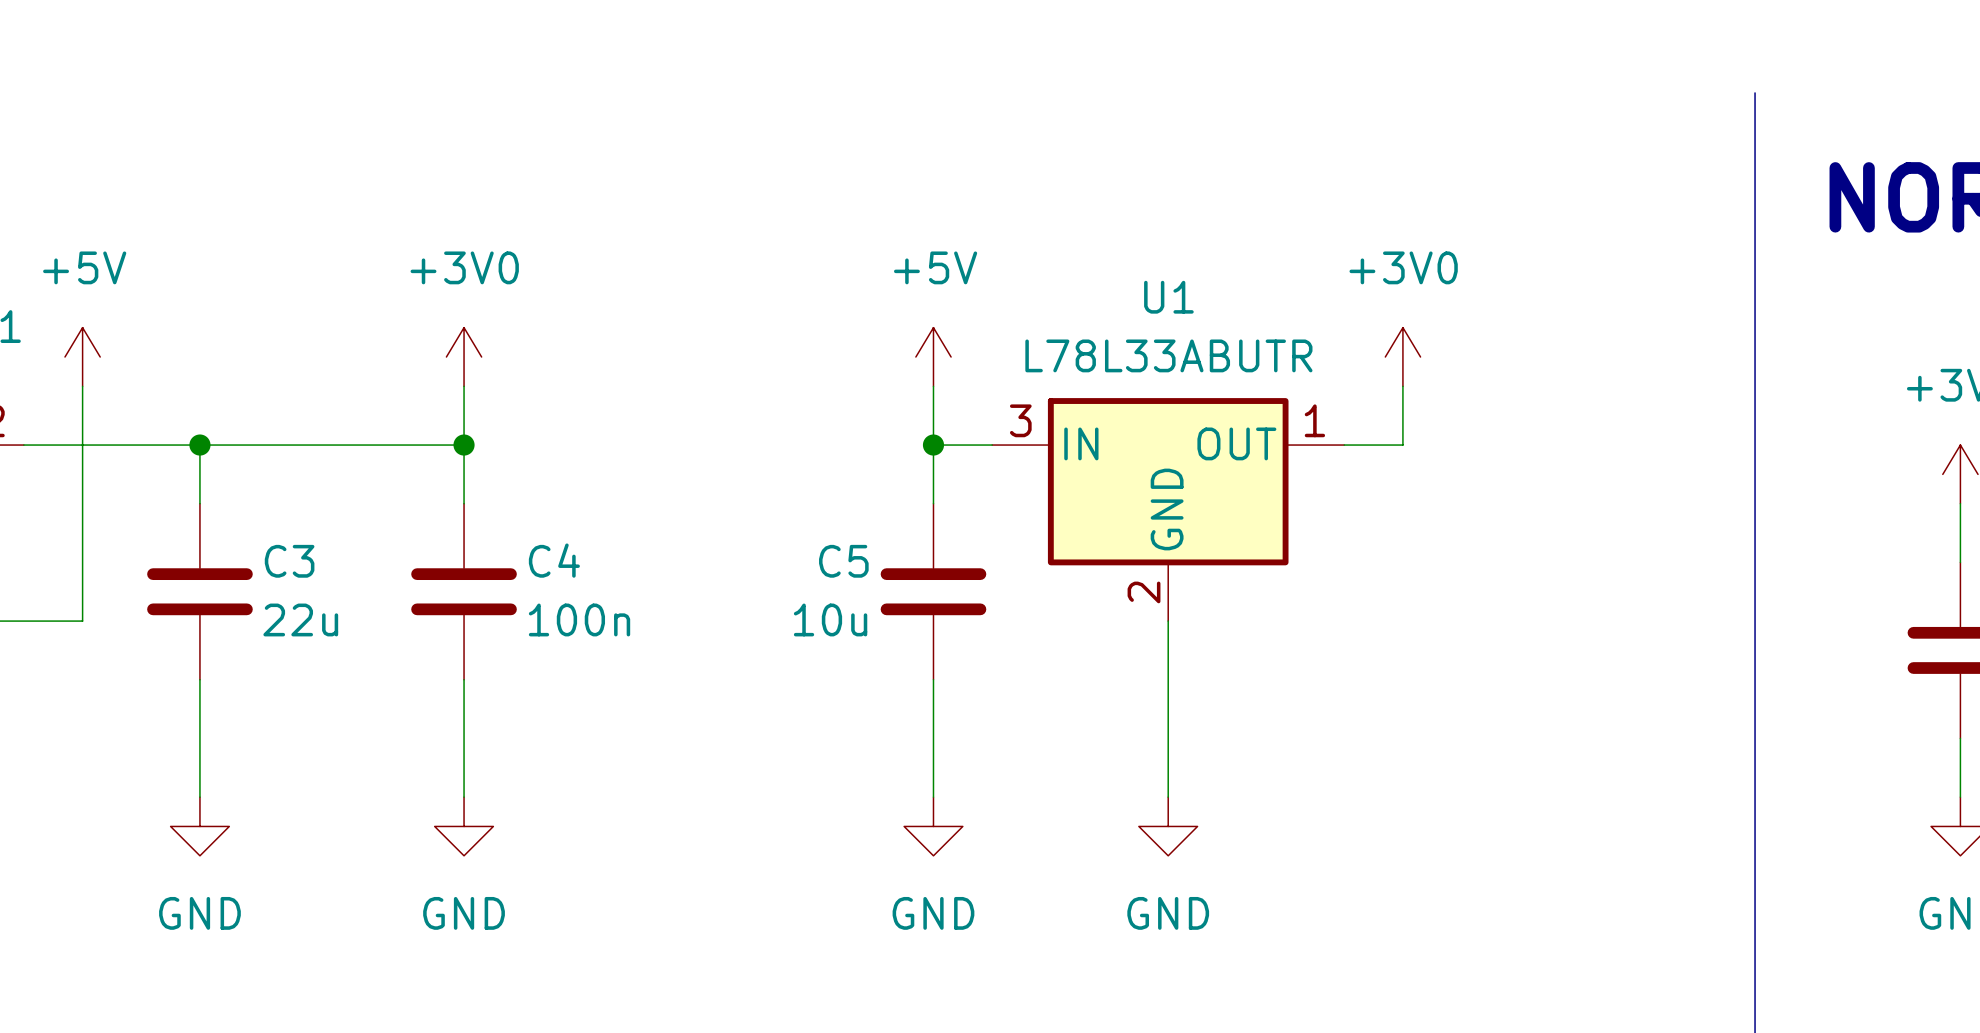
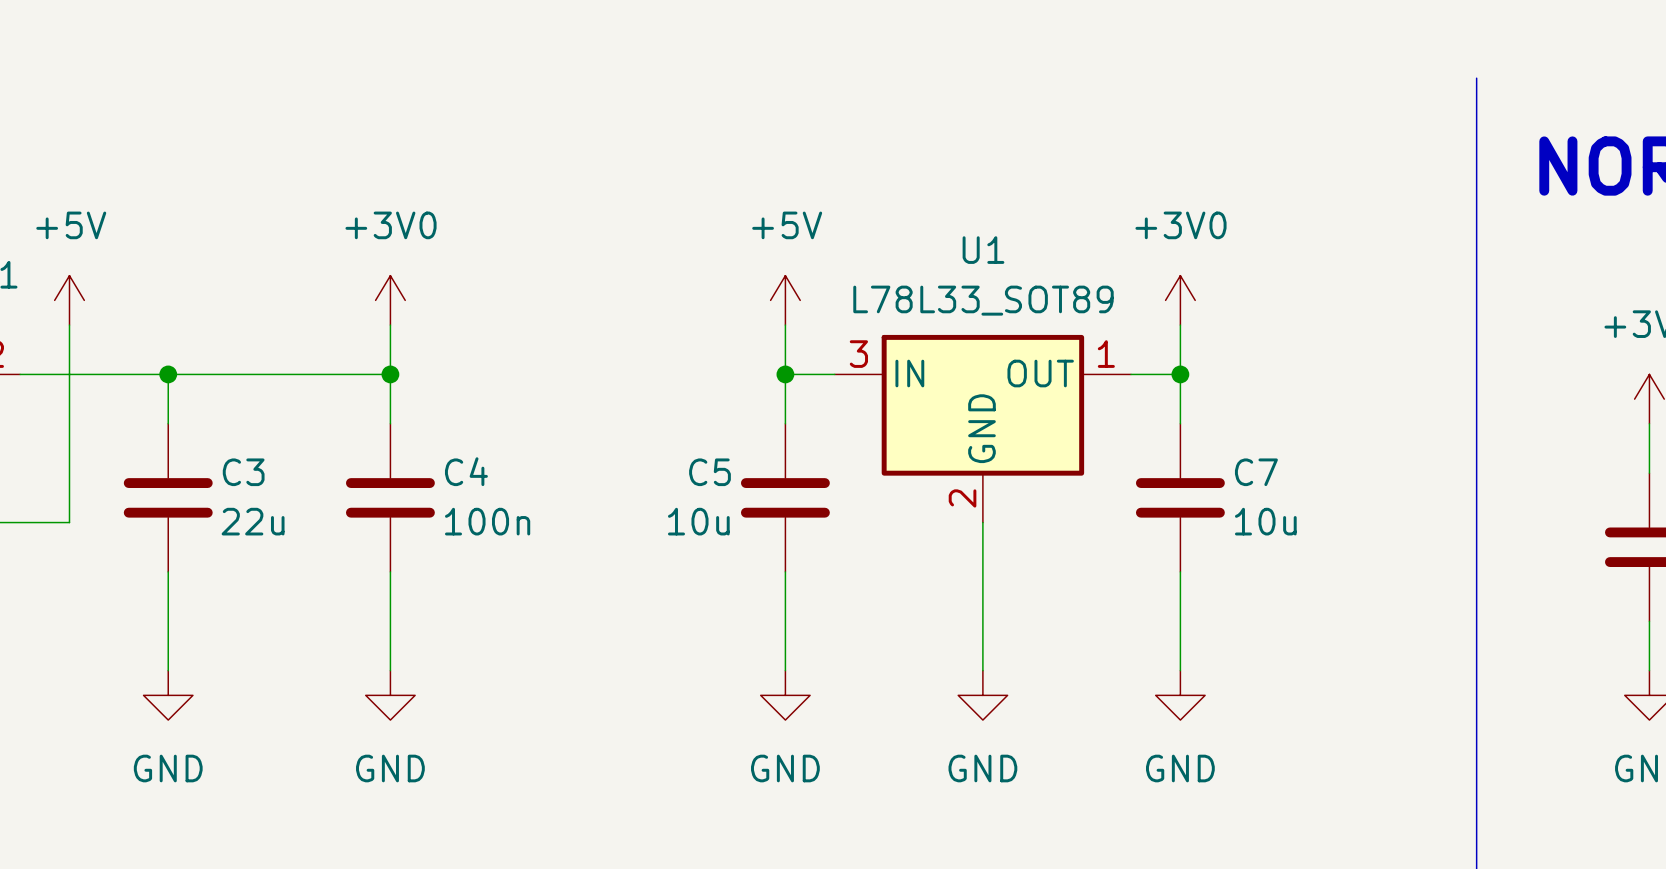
U1 value: L78L33ABUTR (1168, 355) -> L78L33_SOT89 (983, 300)
wire: none -> (1180, 374) (1180, 423)
junction: none -> (1180, 374)
C7: none -> 10u (1180, 497)
wire: none -> (1180, 571) (1180, 670)
power symbol: none -> GND (1180, 695)

